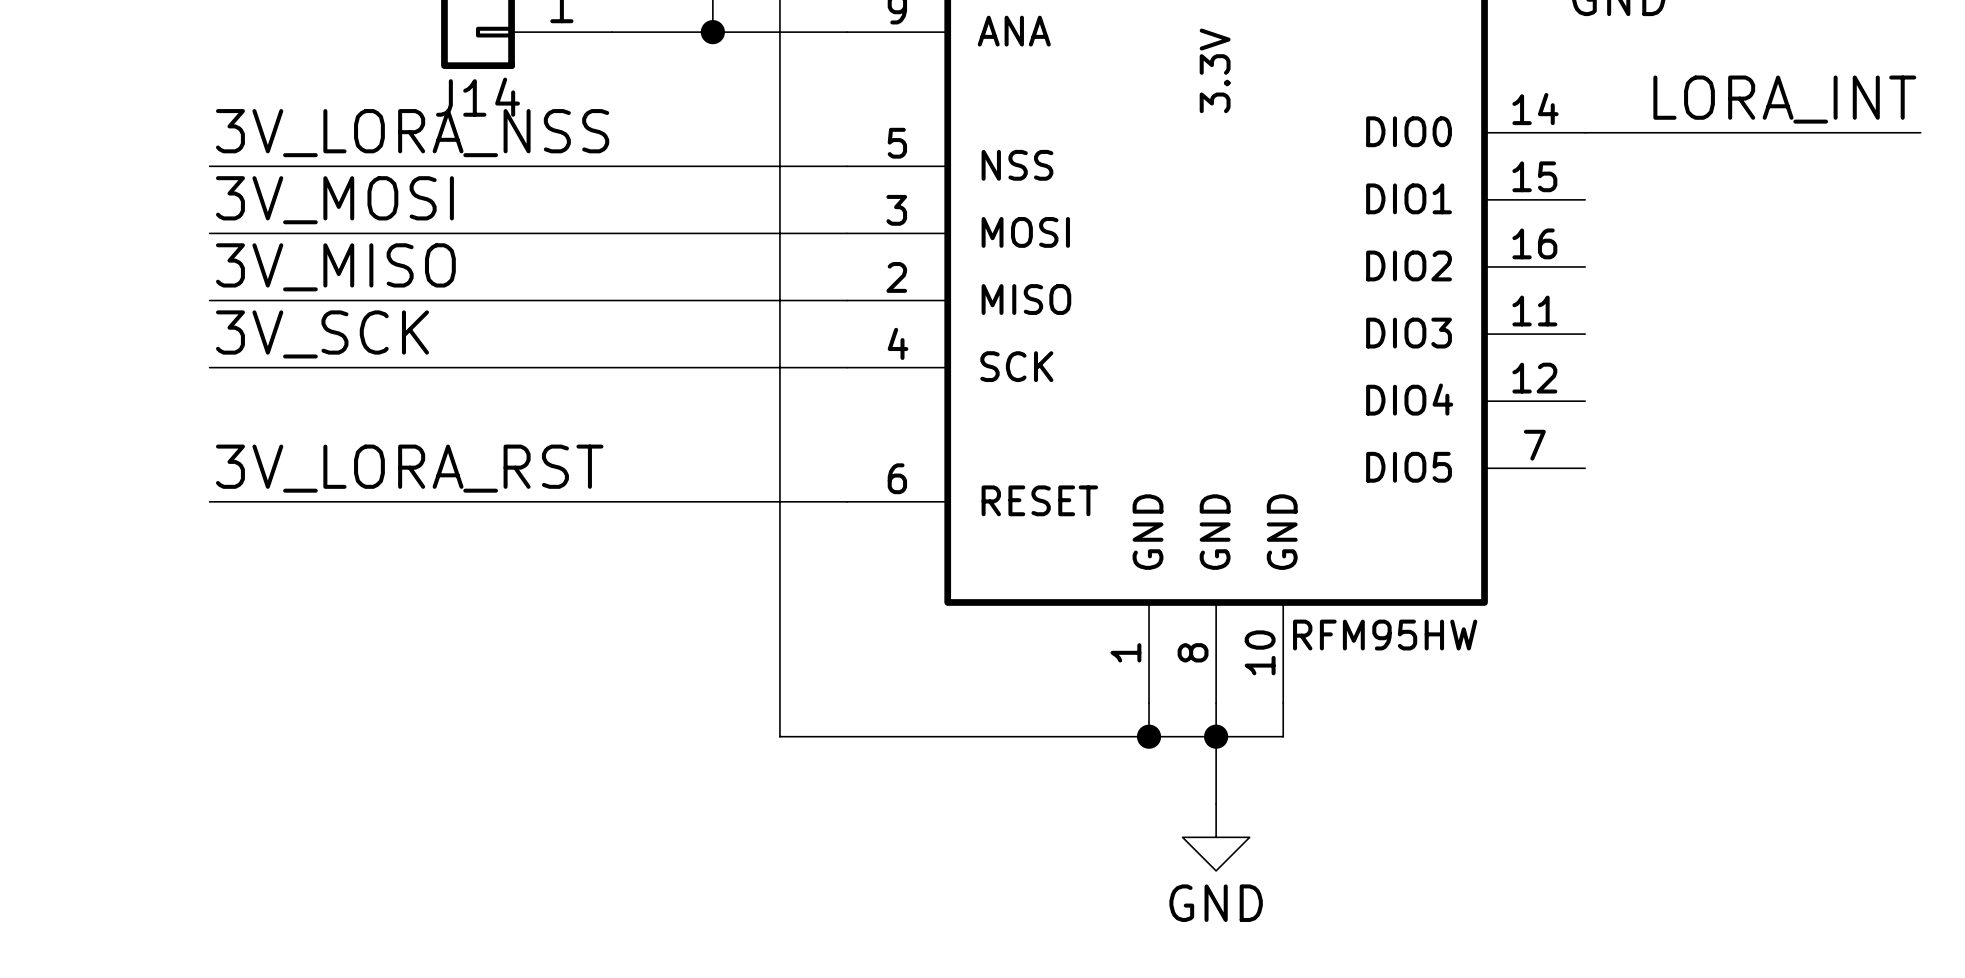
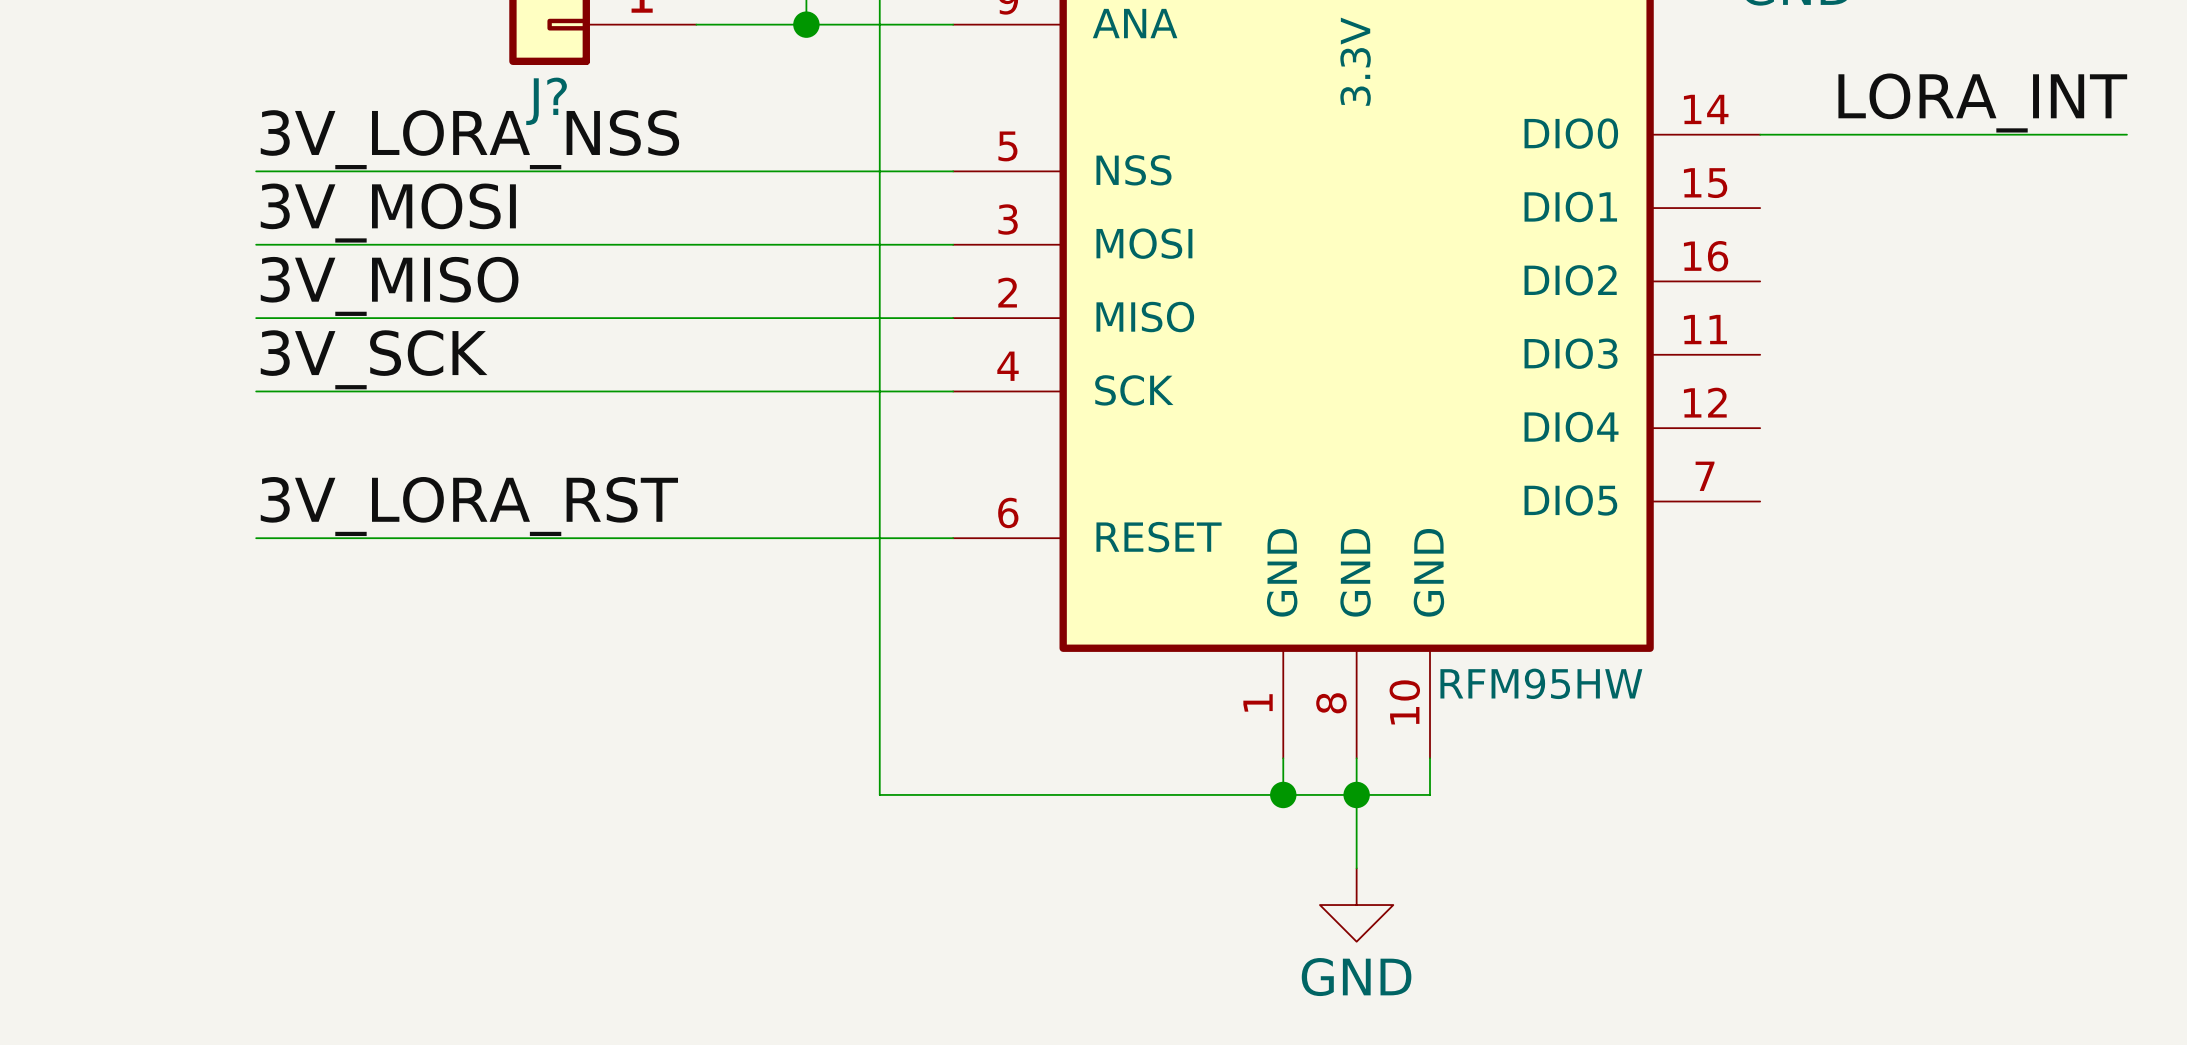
J14 name: J14 (478, 97) -> J? (546, 101)

